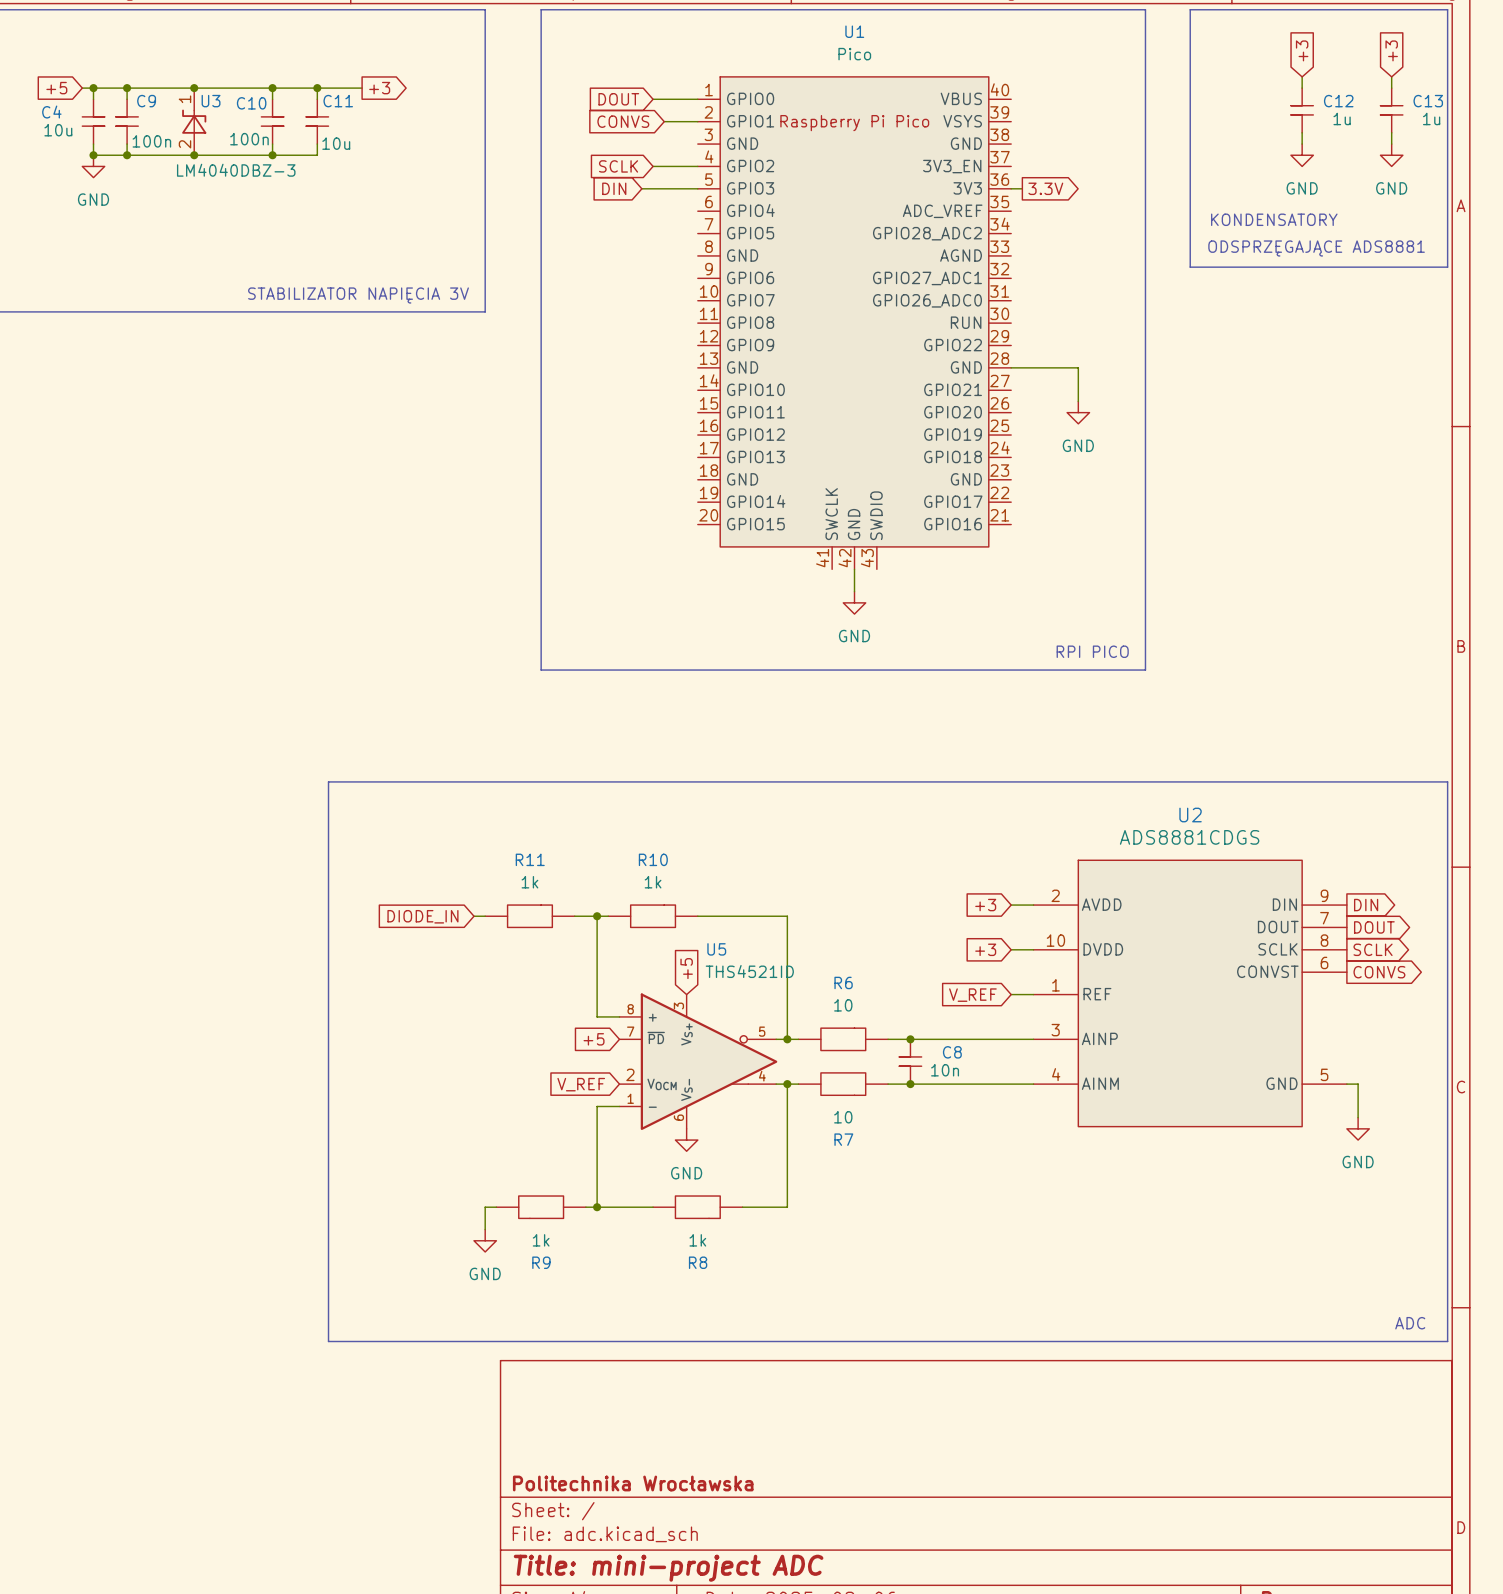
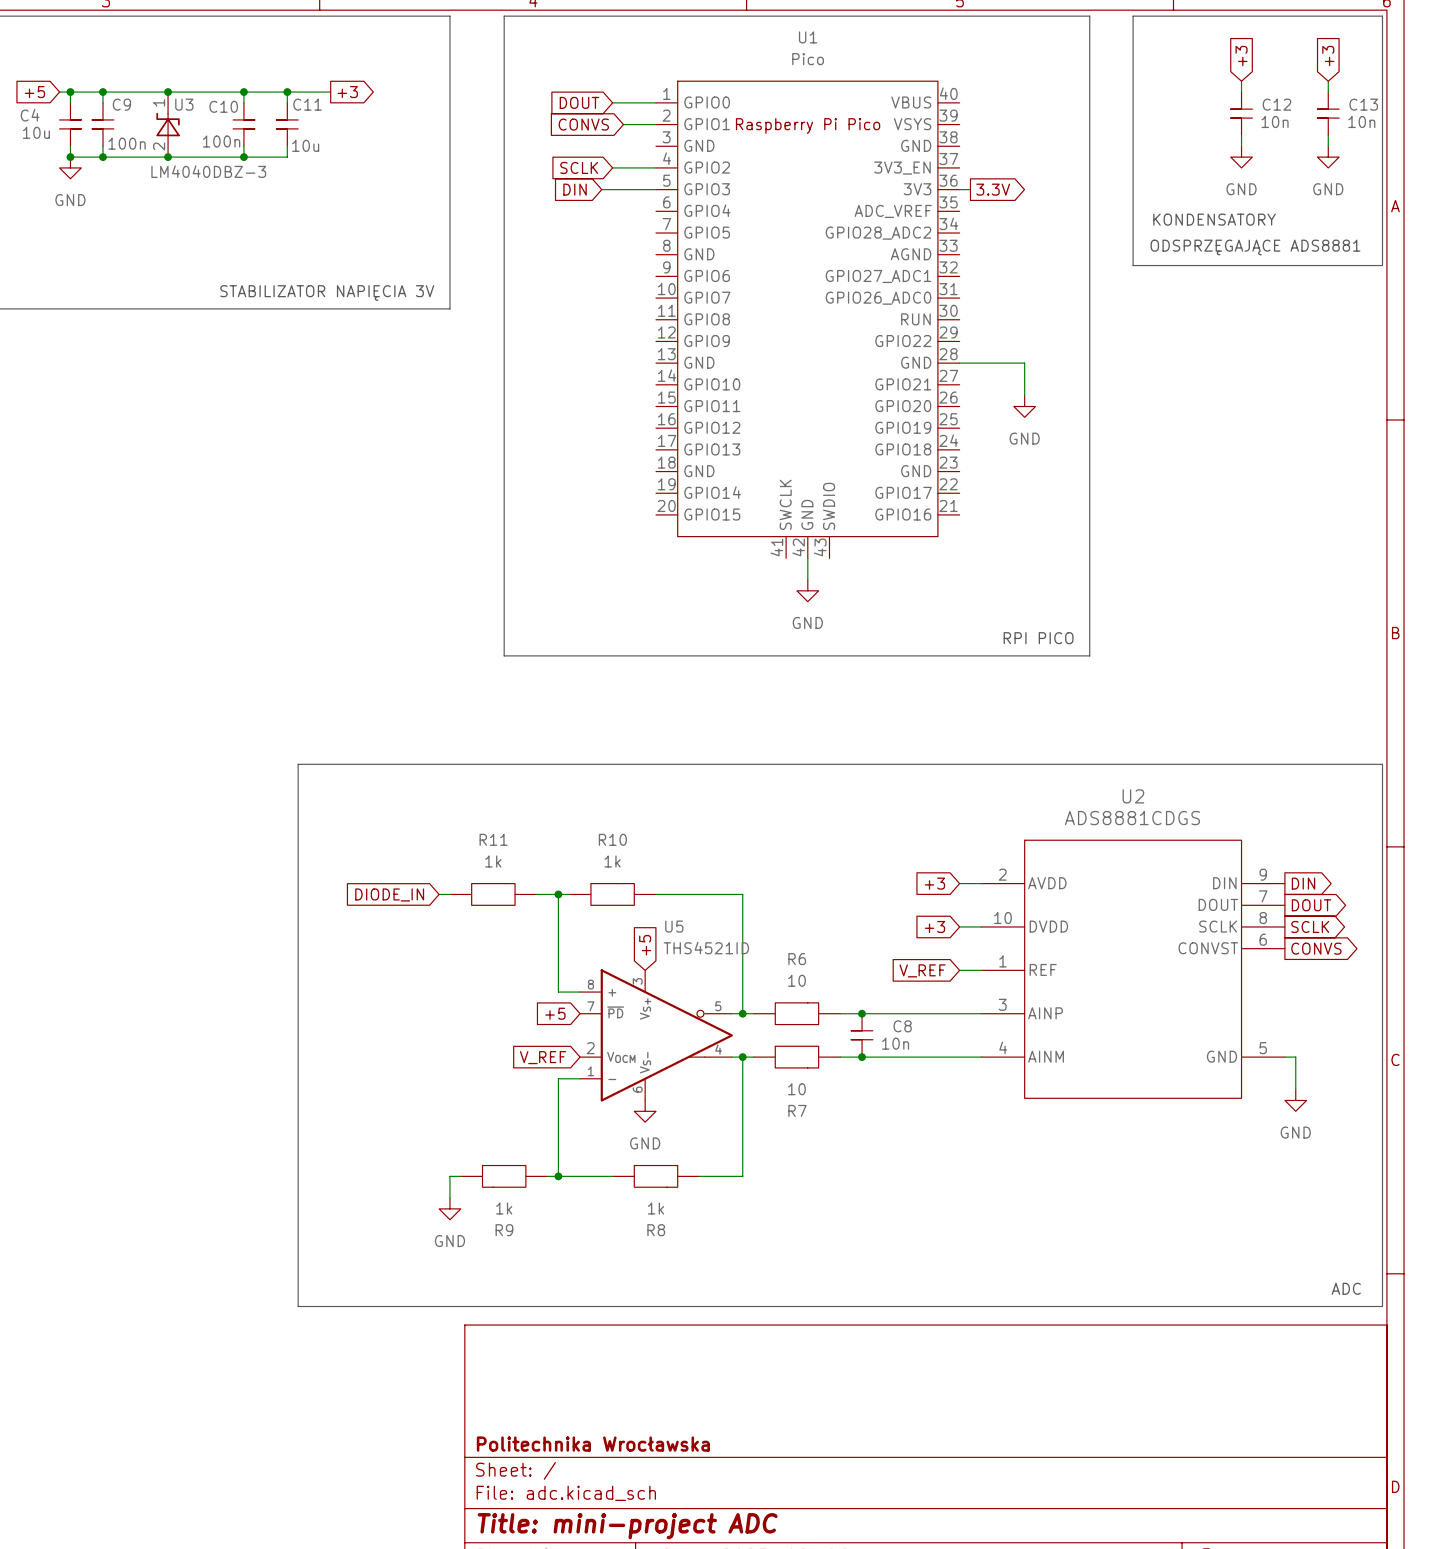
C12 value: 1u (1342, 119) -> 10n (1275, 122)
C13 value: 1u (1431, 119) -> 10n (1361, 122)

